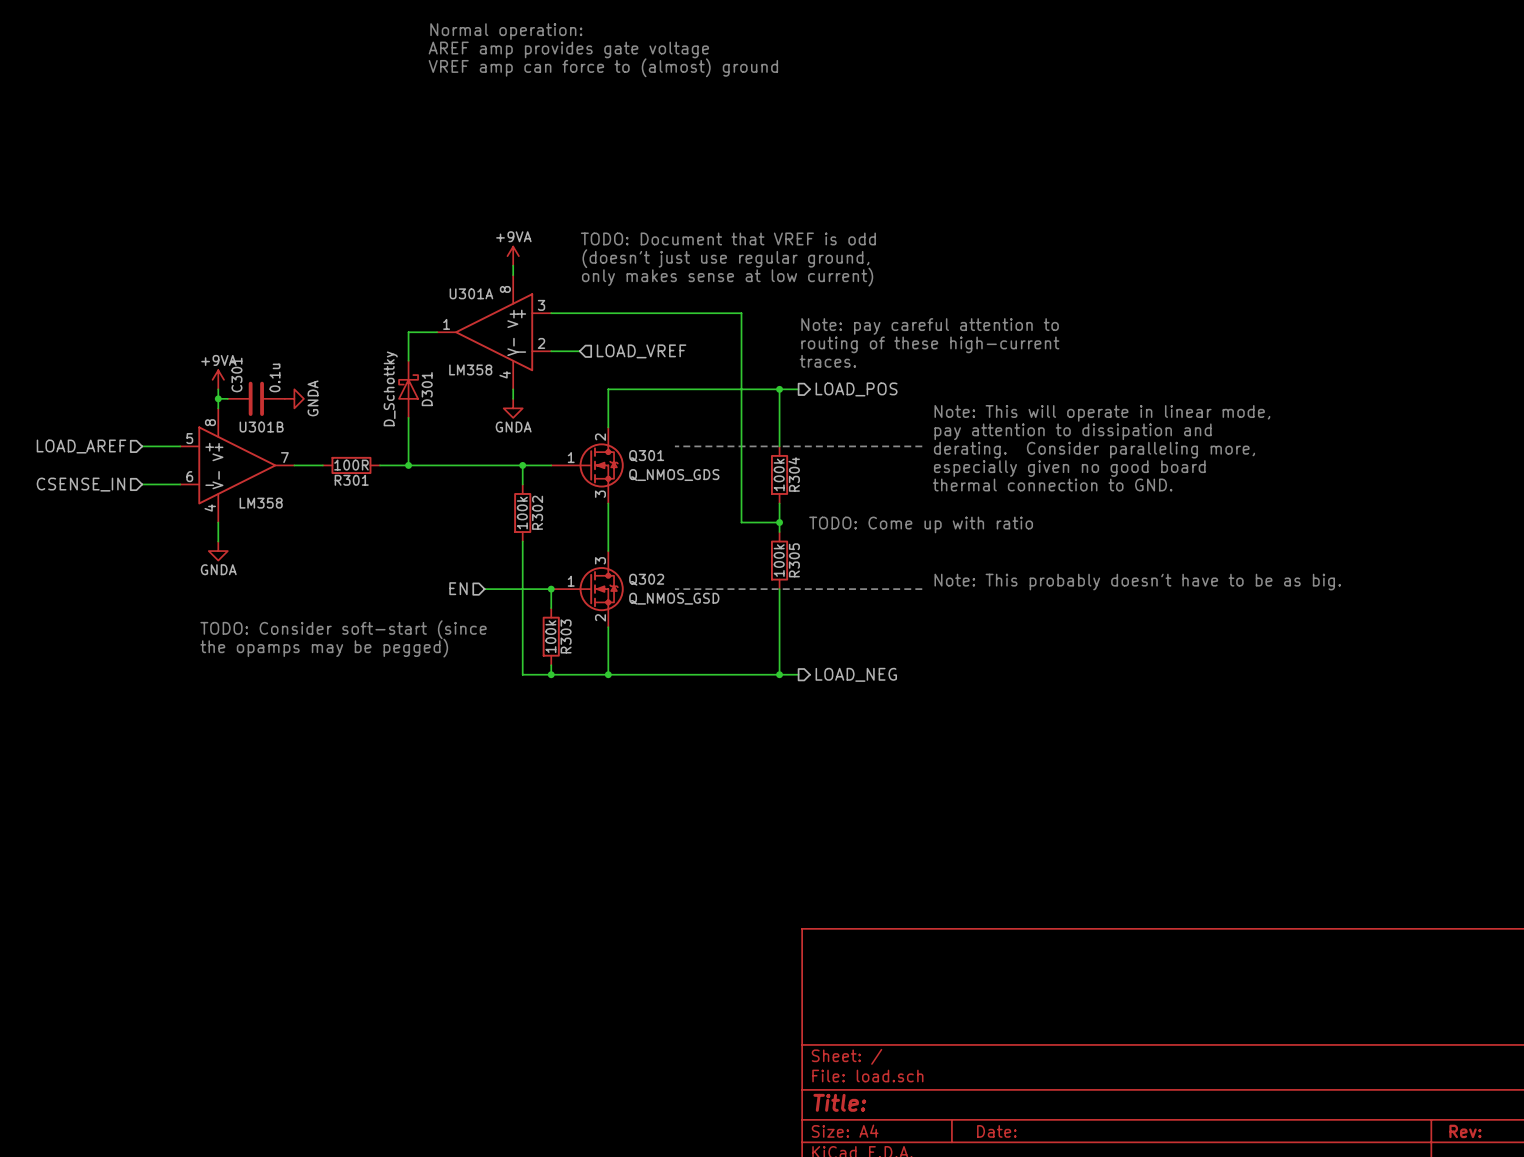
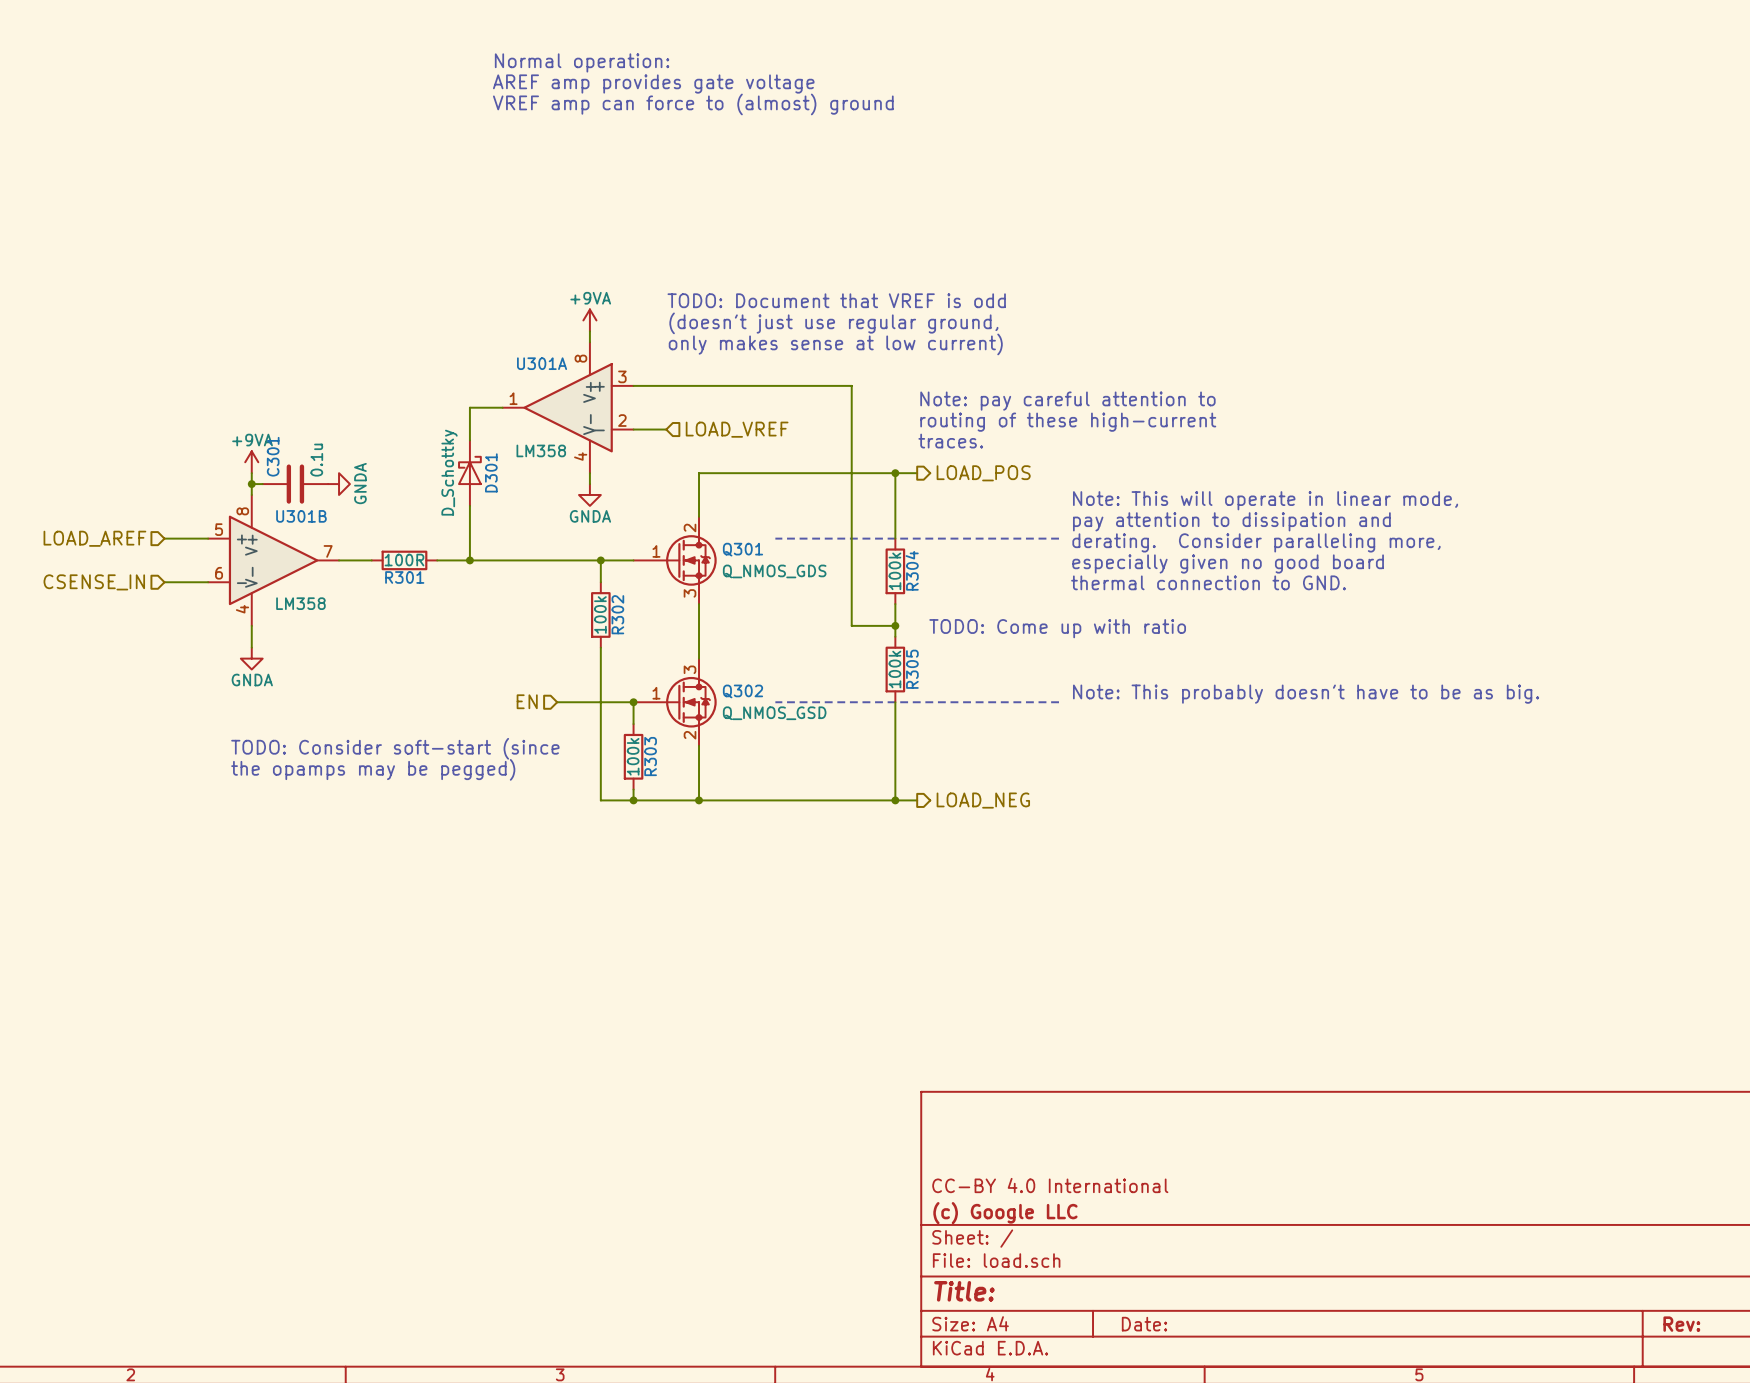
title block: none -> CC-BY 4.0 International (1050, 1185)
title block: none -> (c) Google LLC (1005, 1213)

